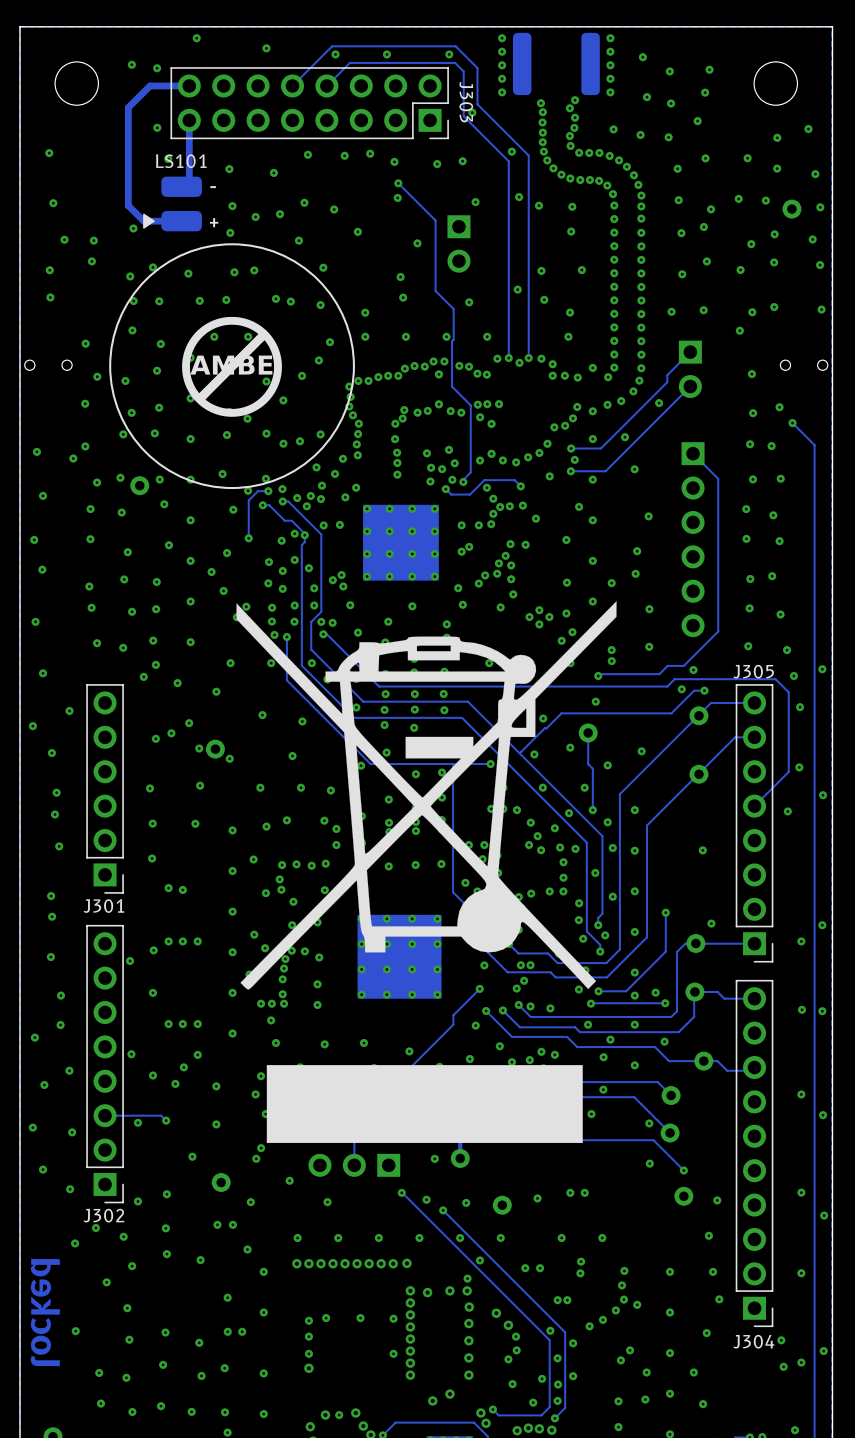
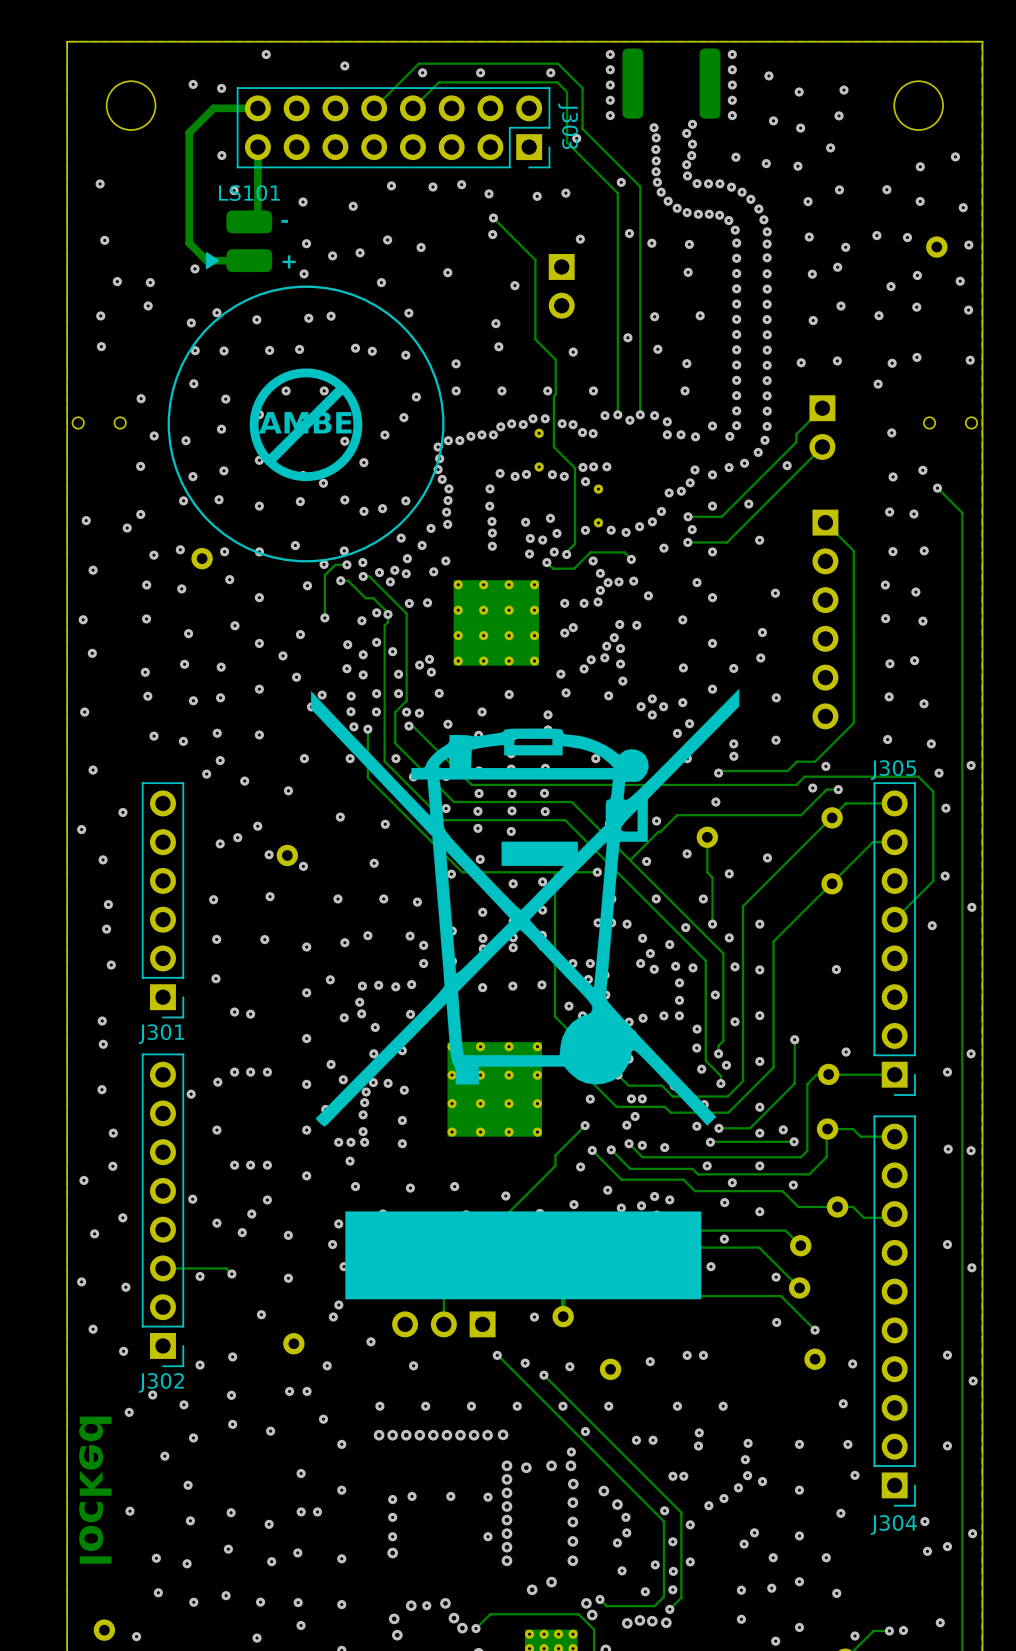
via: (402, 418) -> none

